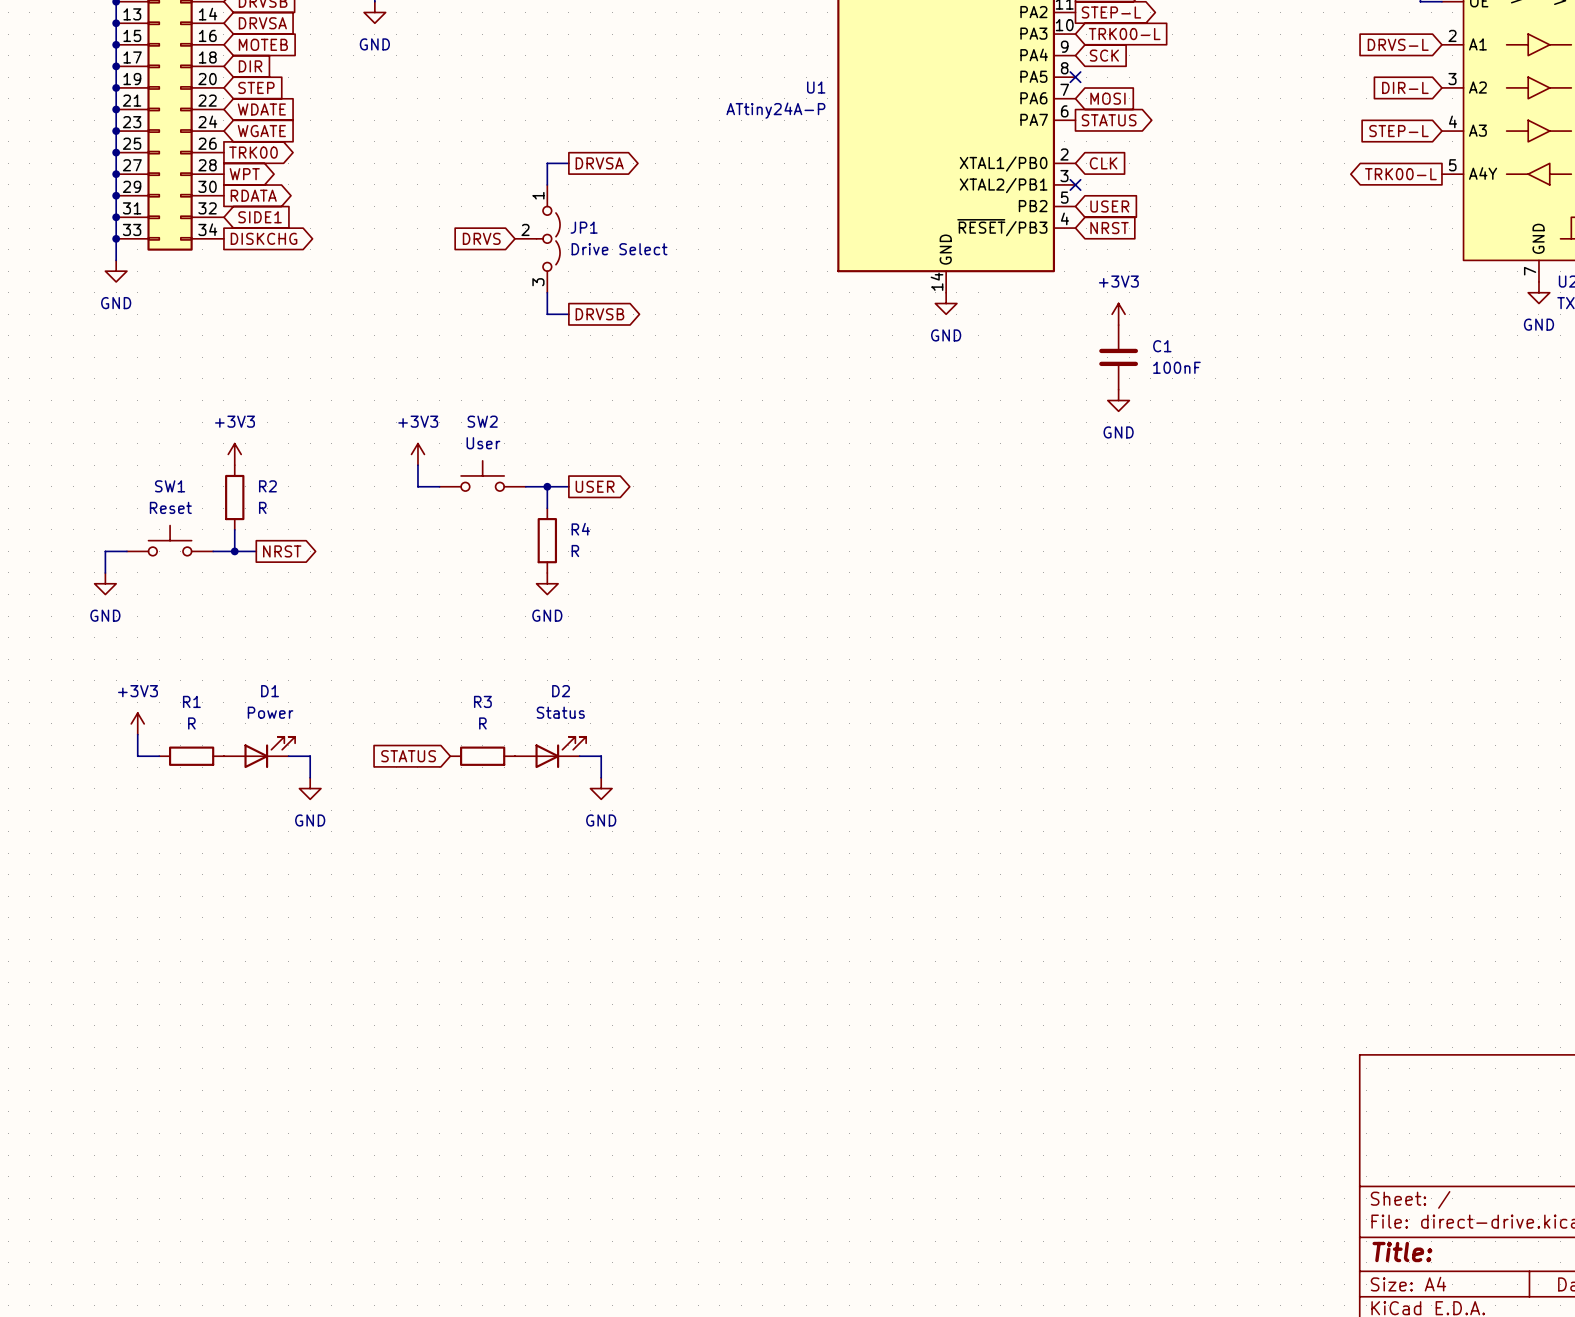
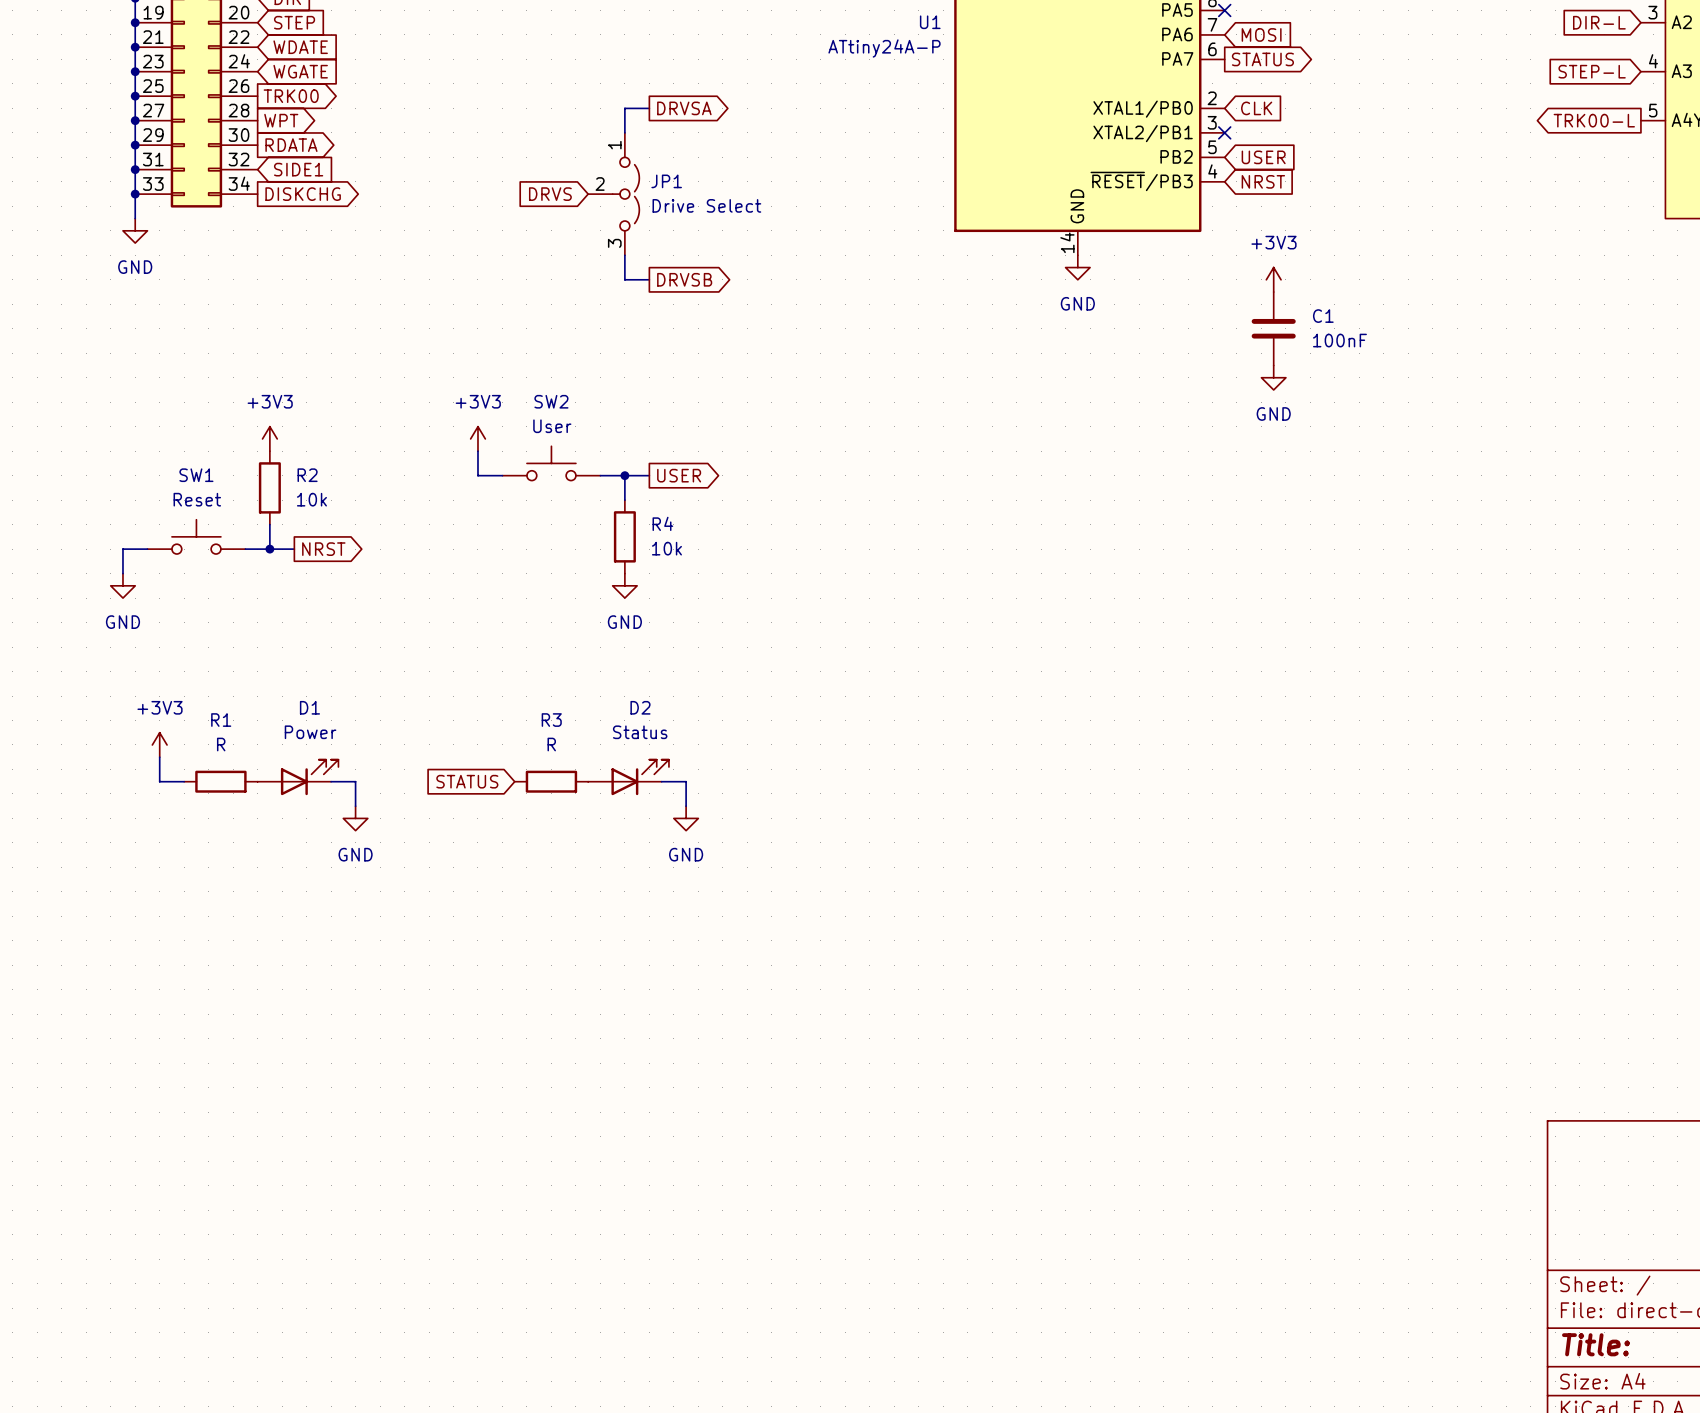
R2 value: R (262, 507) -> 10k (311, 499)
R4 value: R (575, 551) -> 10k (666, 548)

